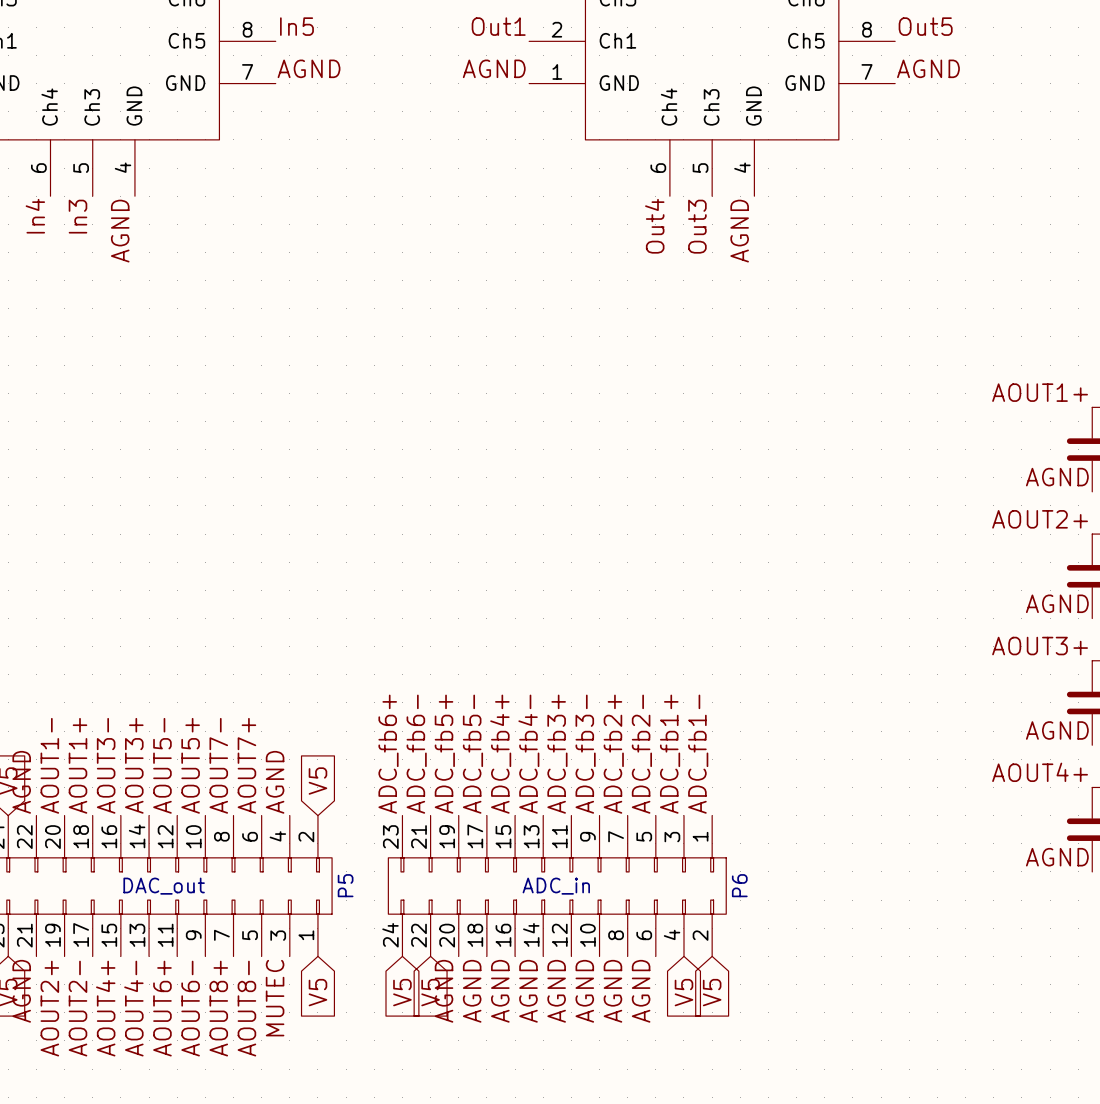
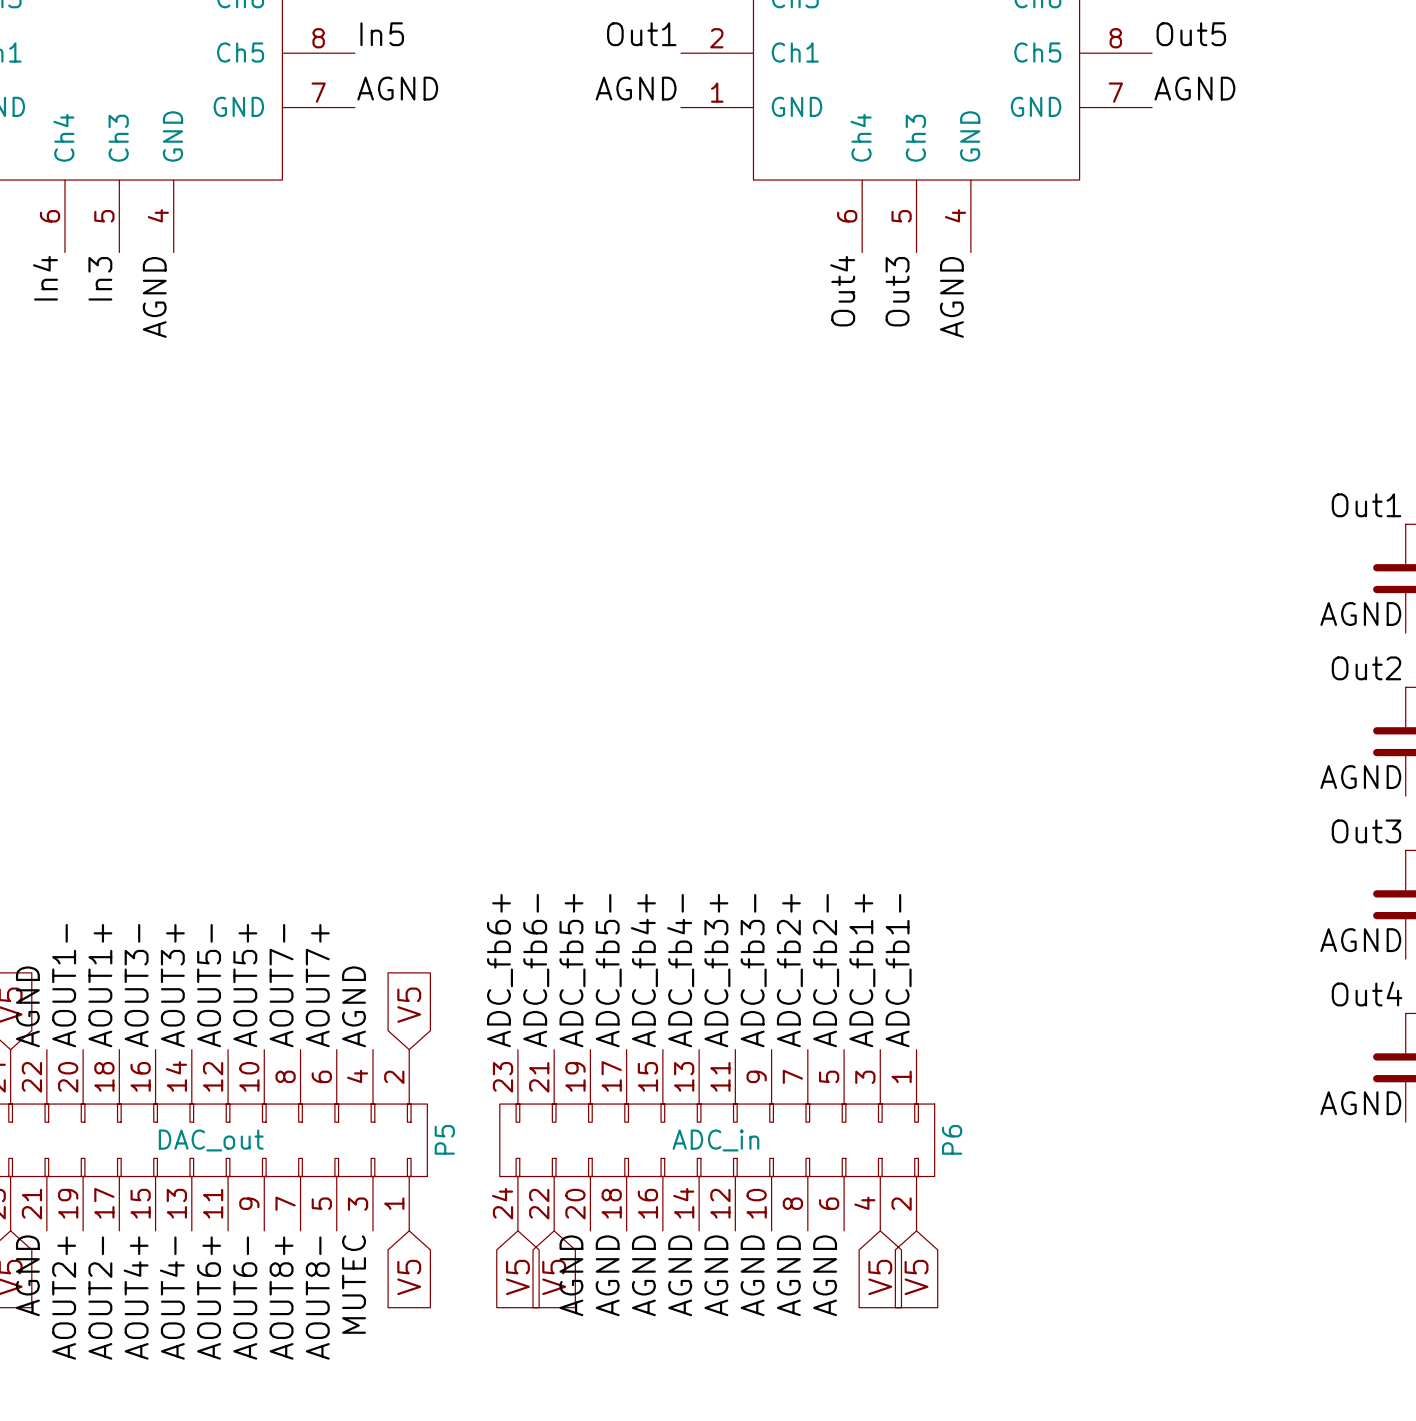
label: AOUT1+ (1040, 392) -> Out1 (1366, 505)
label: AOUT2+ (1040, 519) -> Out2 (1366, 668)
label: AOUT3+ (1040, 646) -> Out3 (1366, 831)
label: AOUT4+ (1040, 772) -> Out4 (1367, 993)

